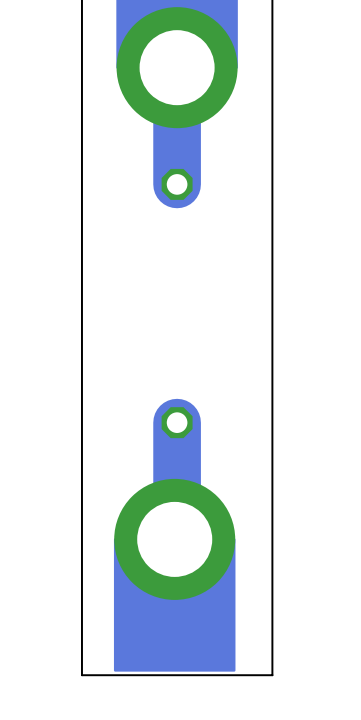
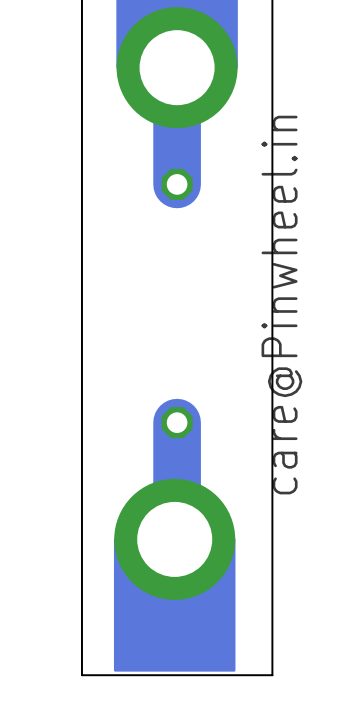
text: none -> care@Pinwheel.in (281, 305)

